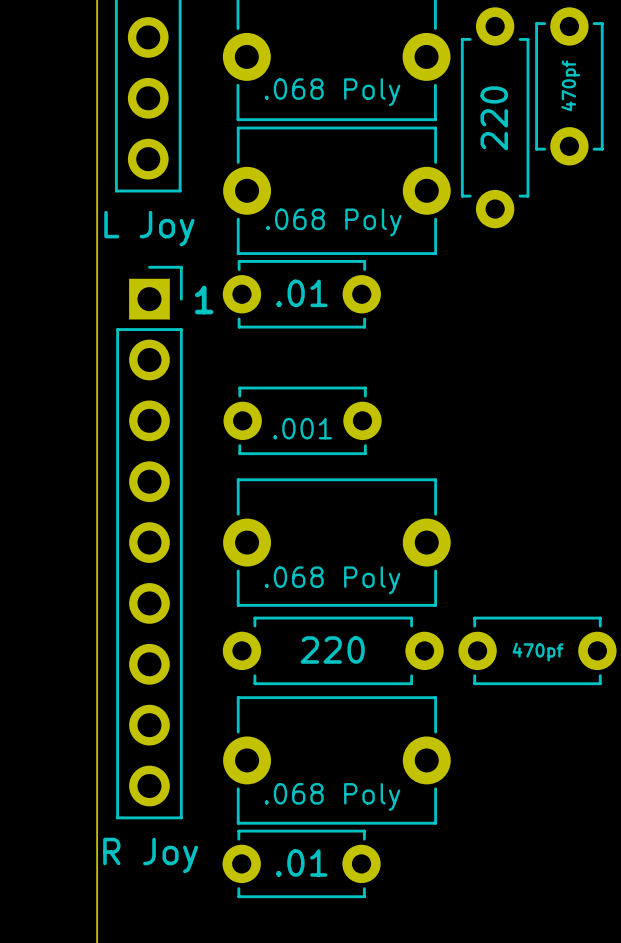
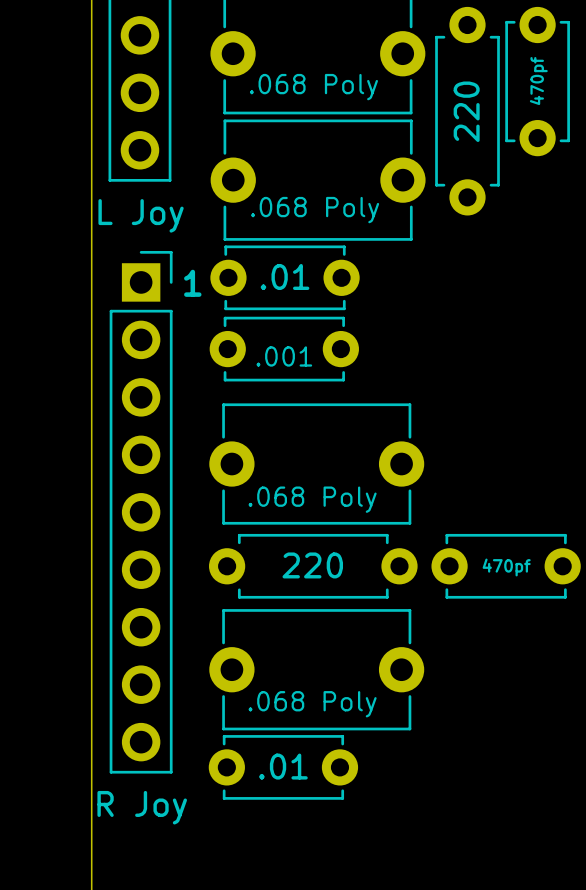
part position: (302, 420) -> (284, 349)
part position: (336, 542) -> (316, 464)
text position: .068 Poly (332, 580) -> .068 Poly (312, 499)
part position: (333, 650) -> (313, 566)
part position: (537, 650) -> (506, 566)
part position: (336, 760) -> (316, 669)
text position: .068 Poly (332, 797) -> .068 Poly (312, 704)
part position: (301, 863) -> (283, 767)

